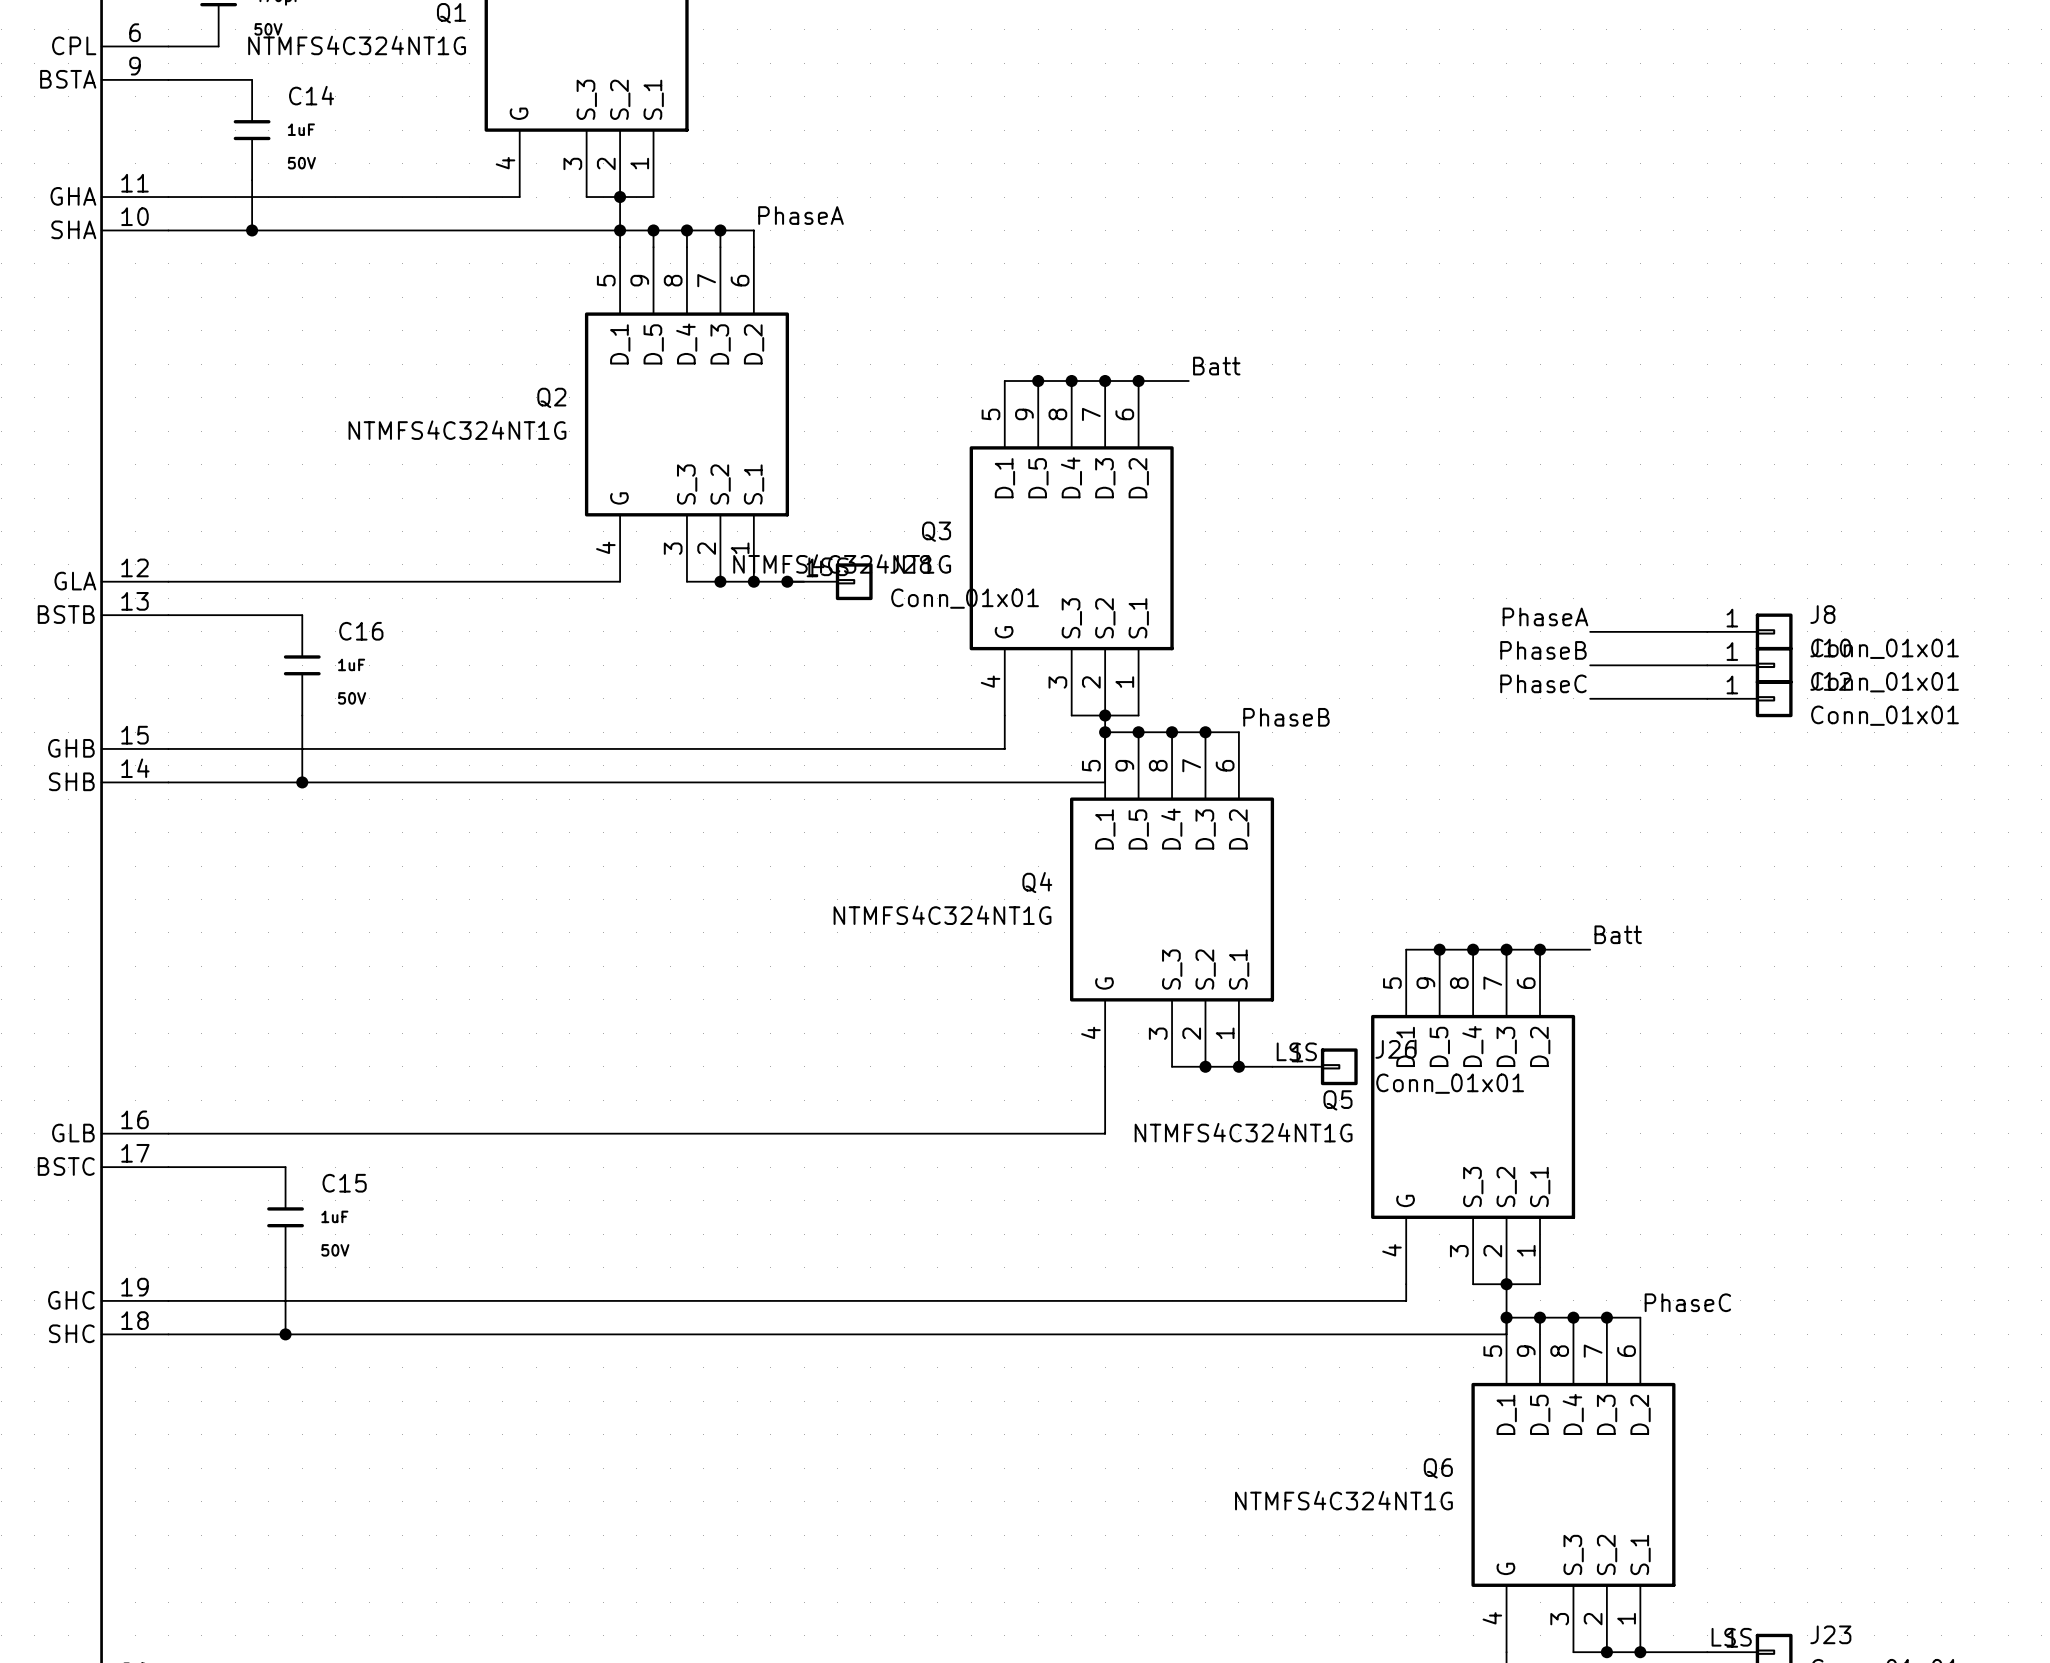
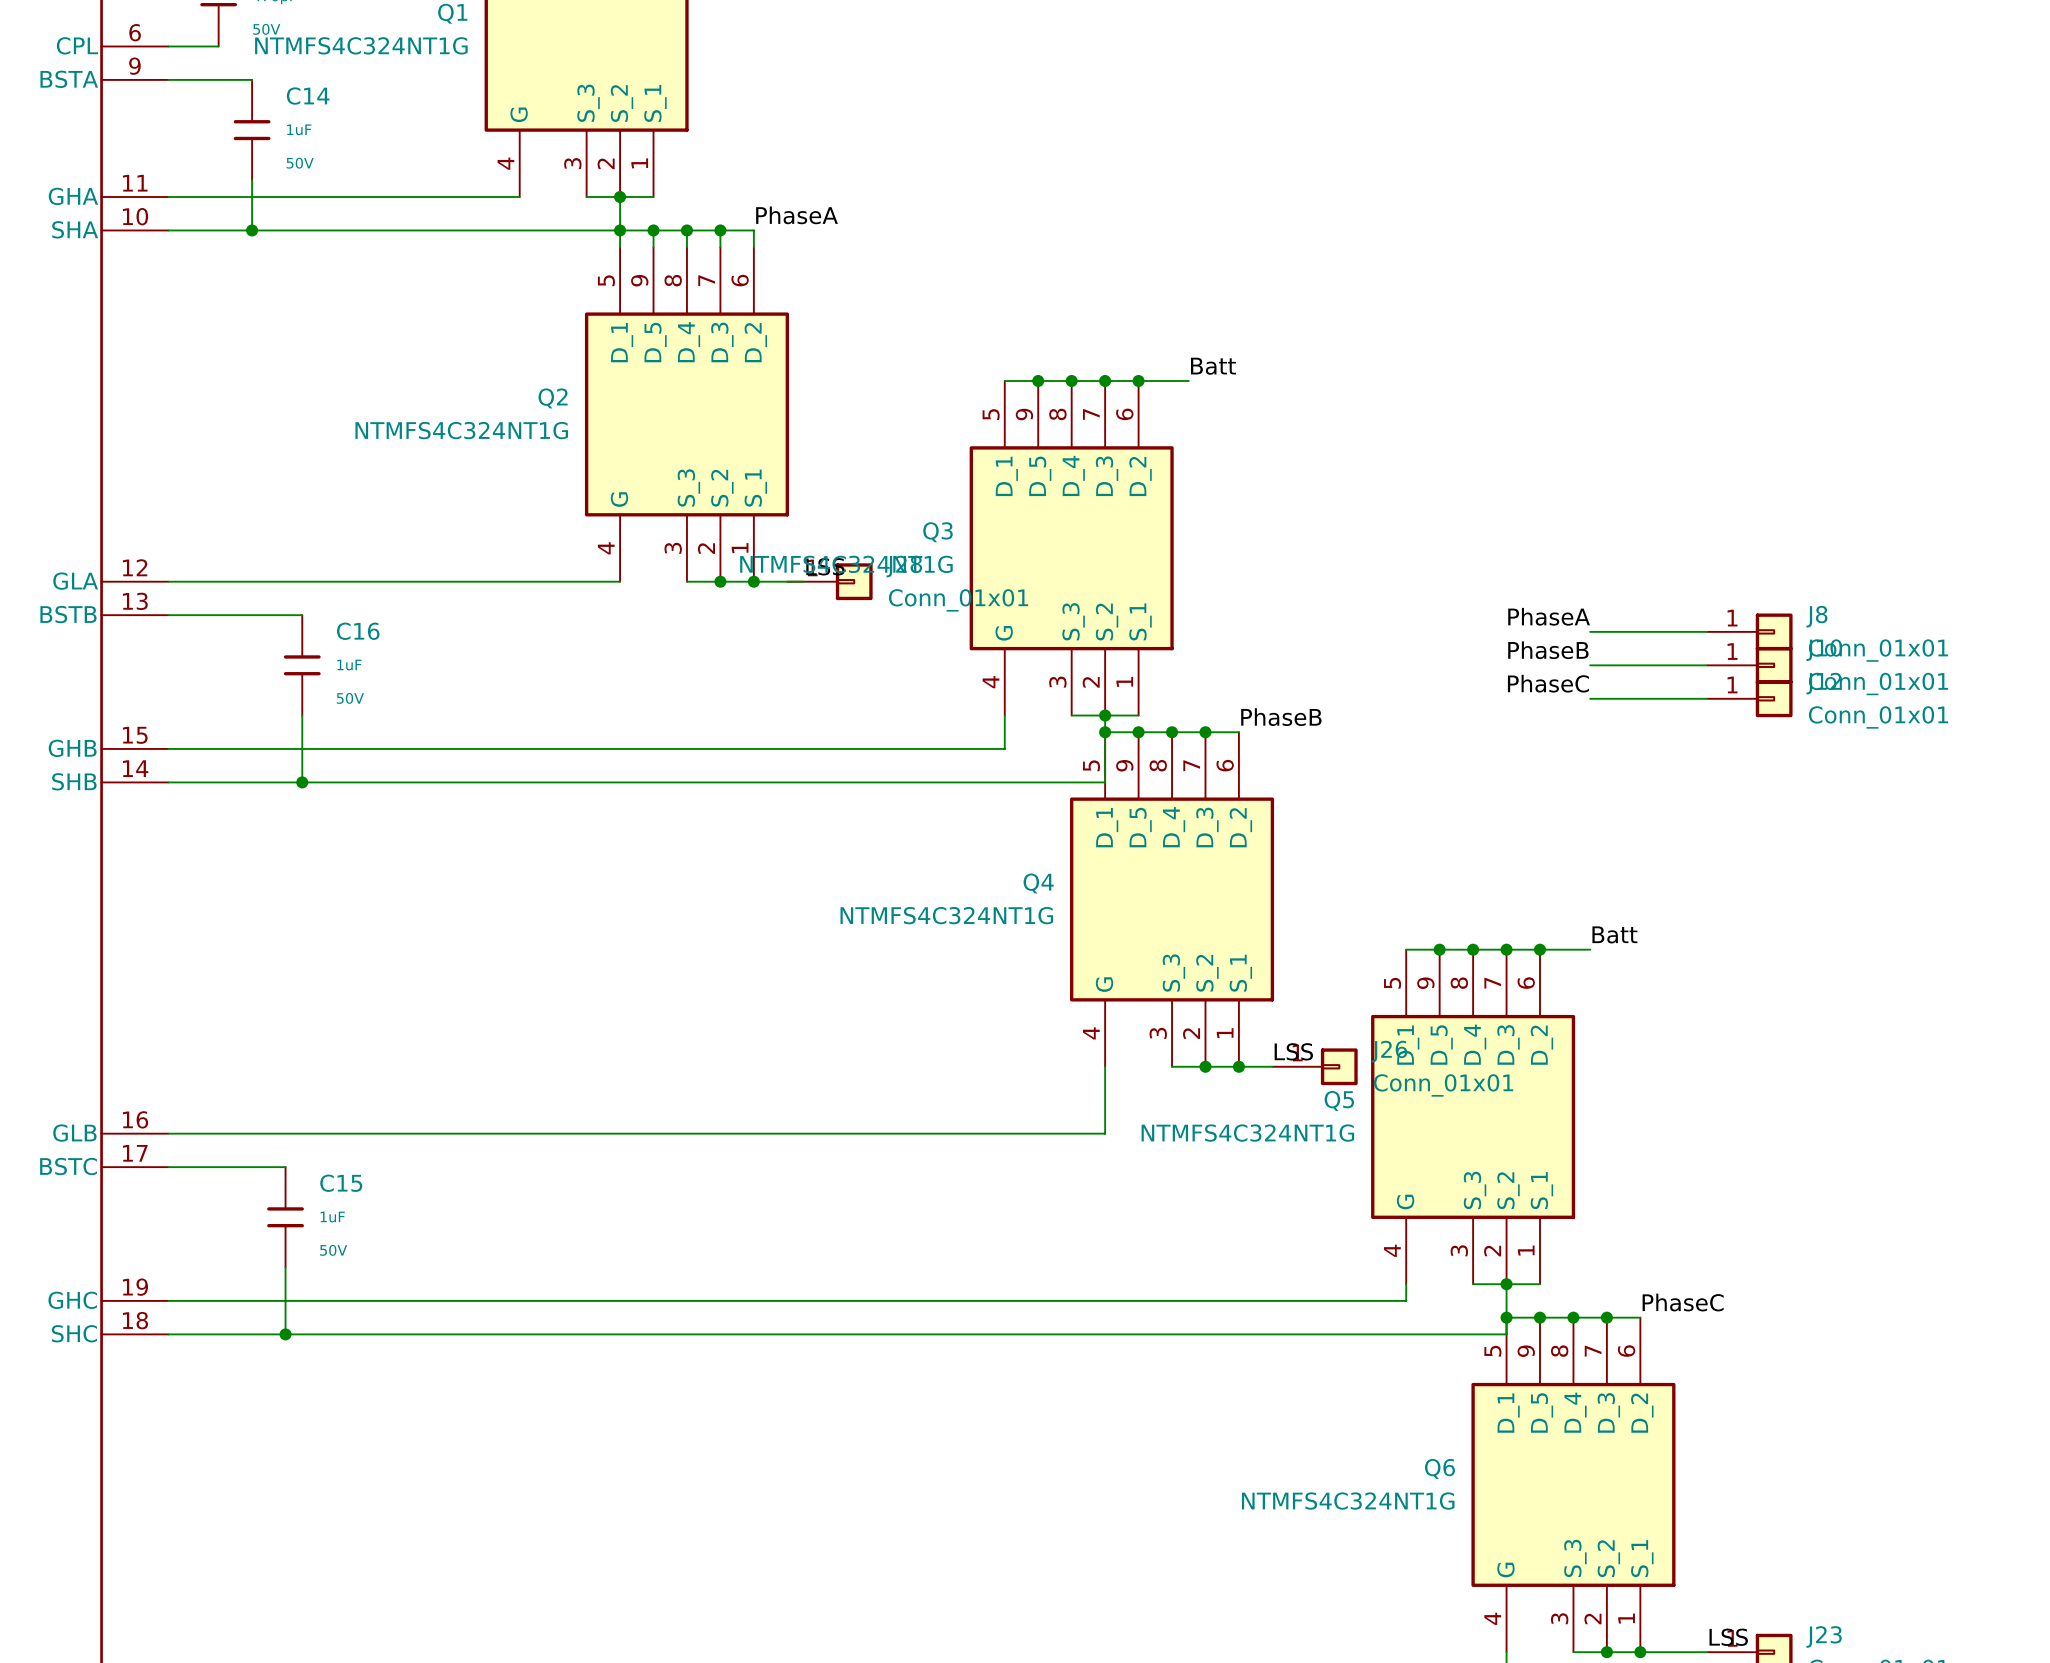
junction: (787, 581) -> none

